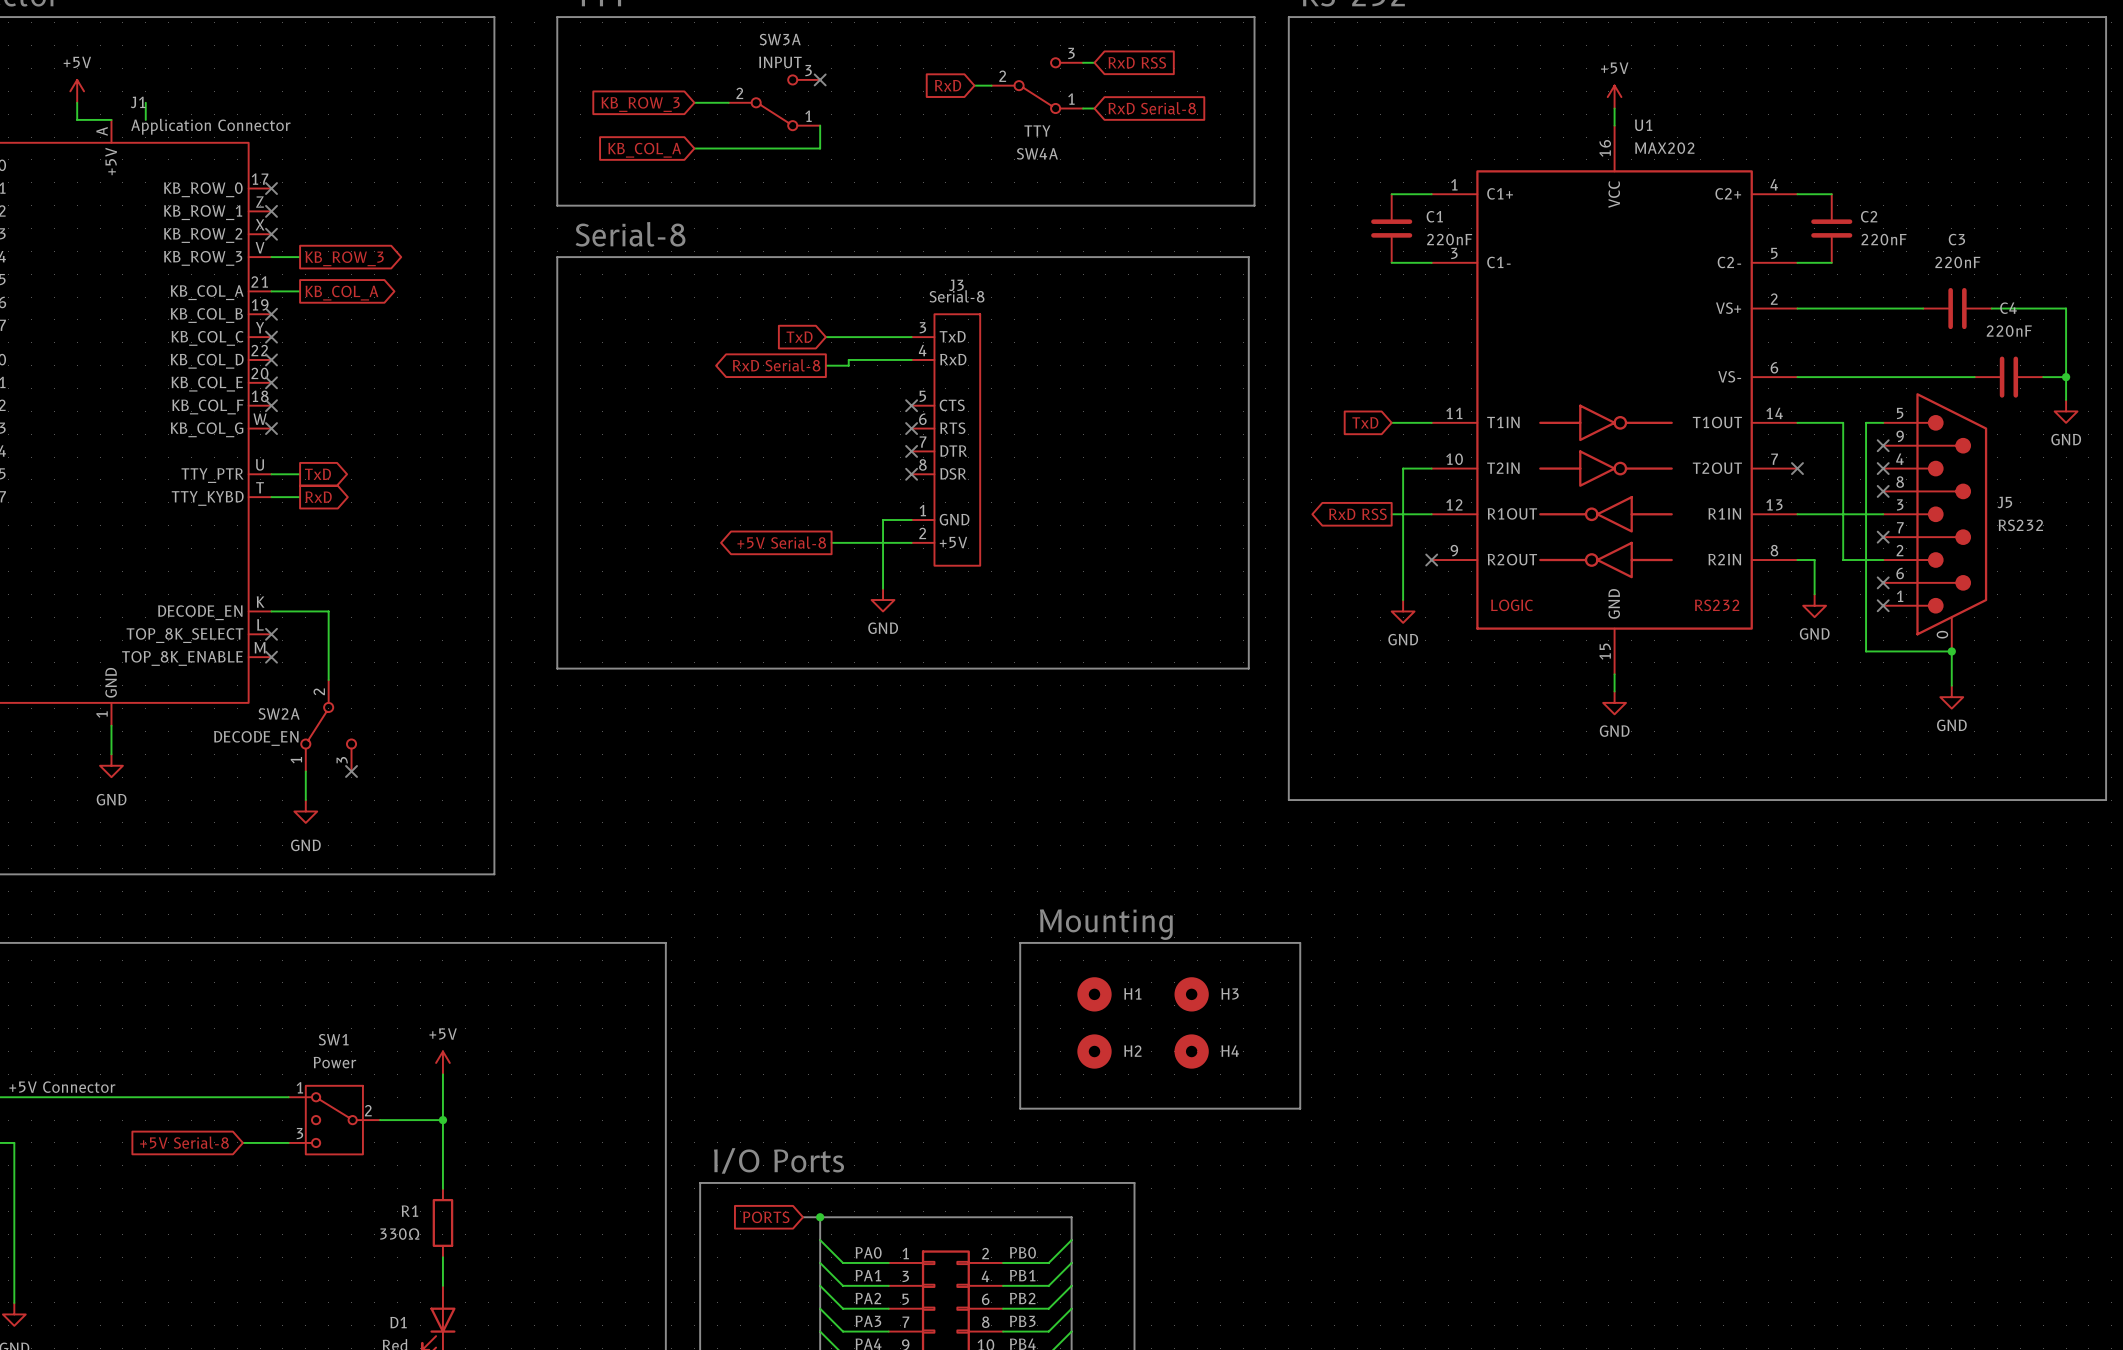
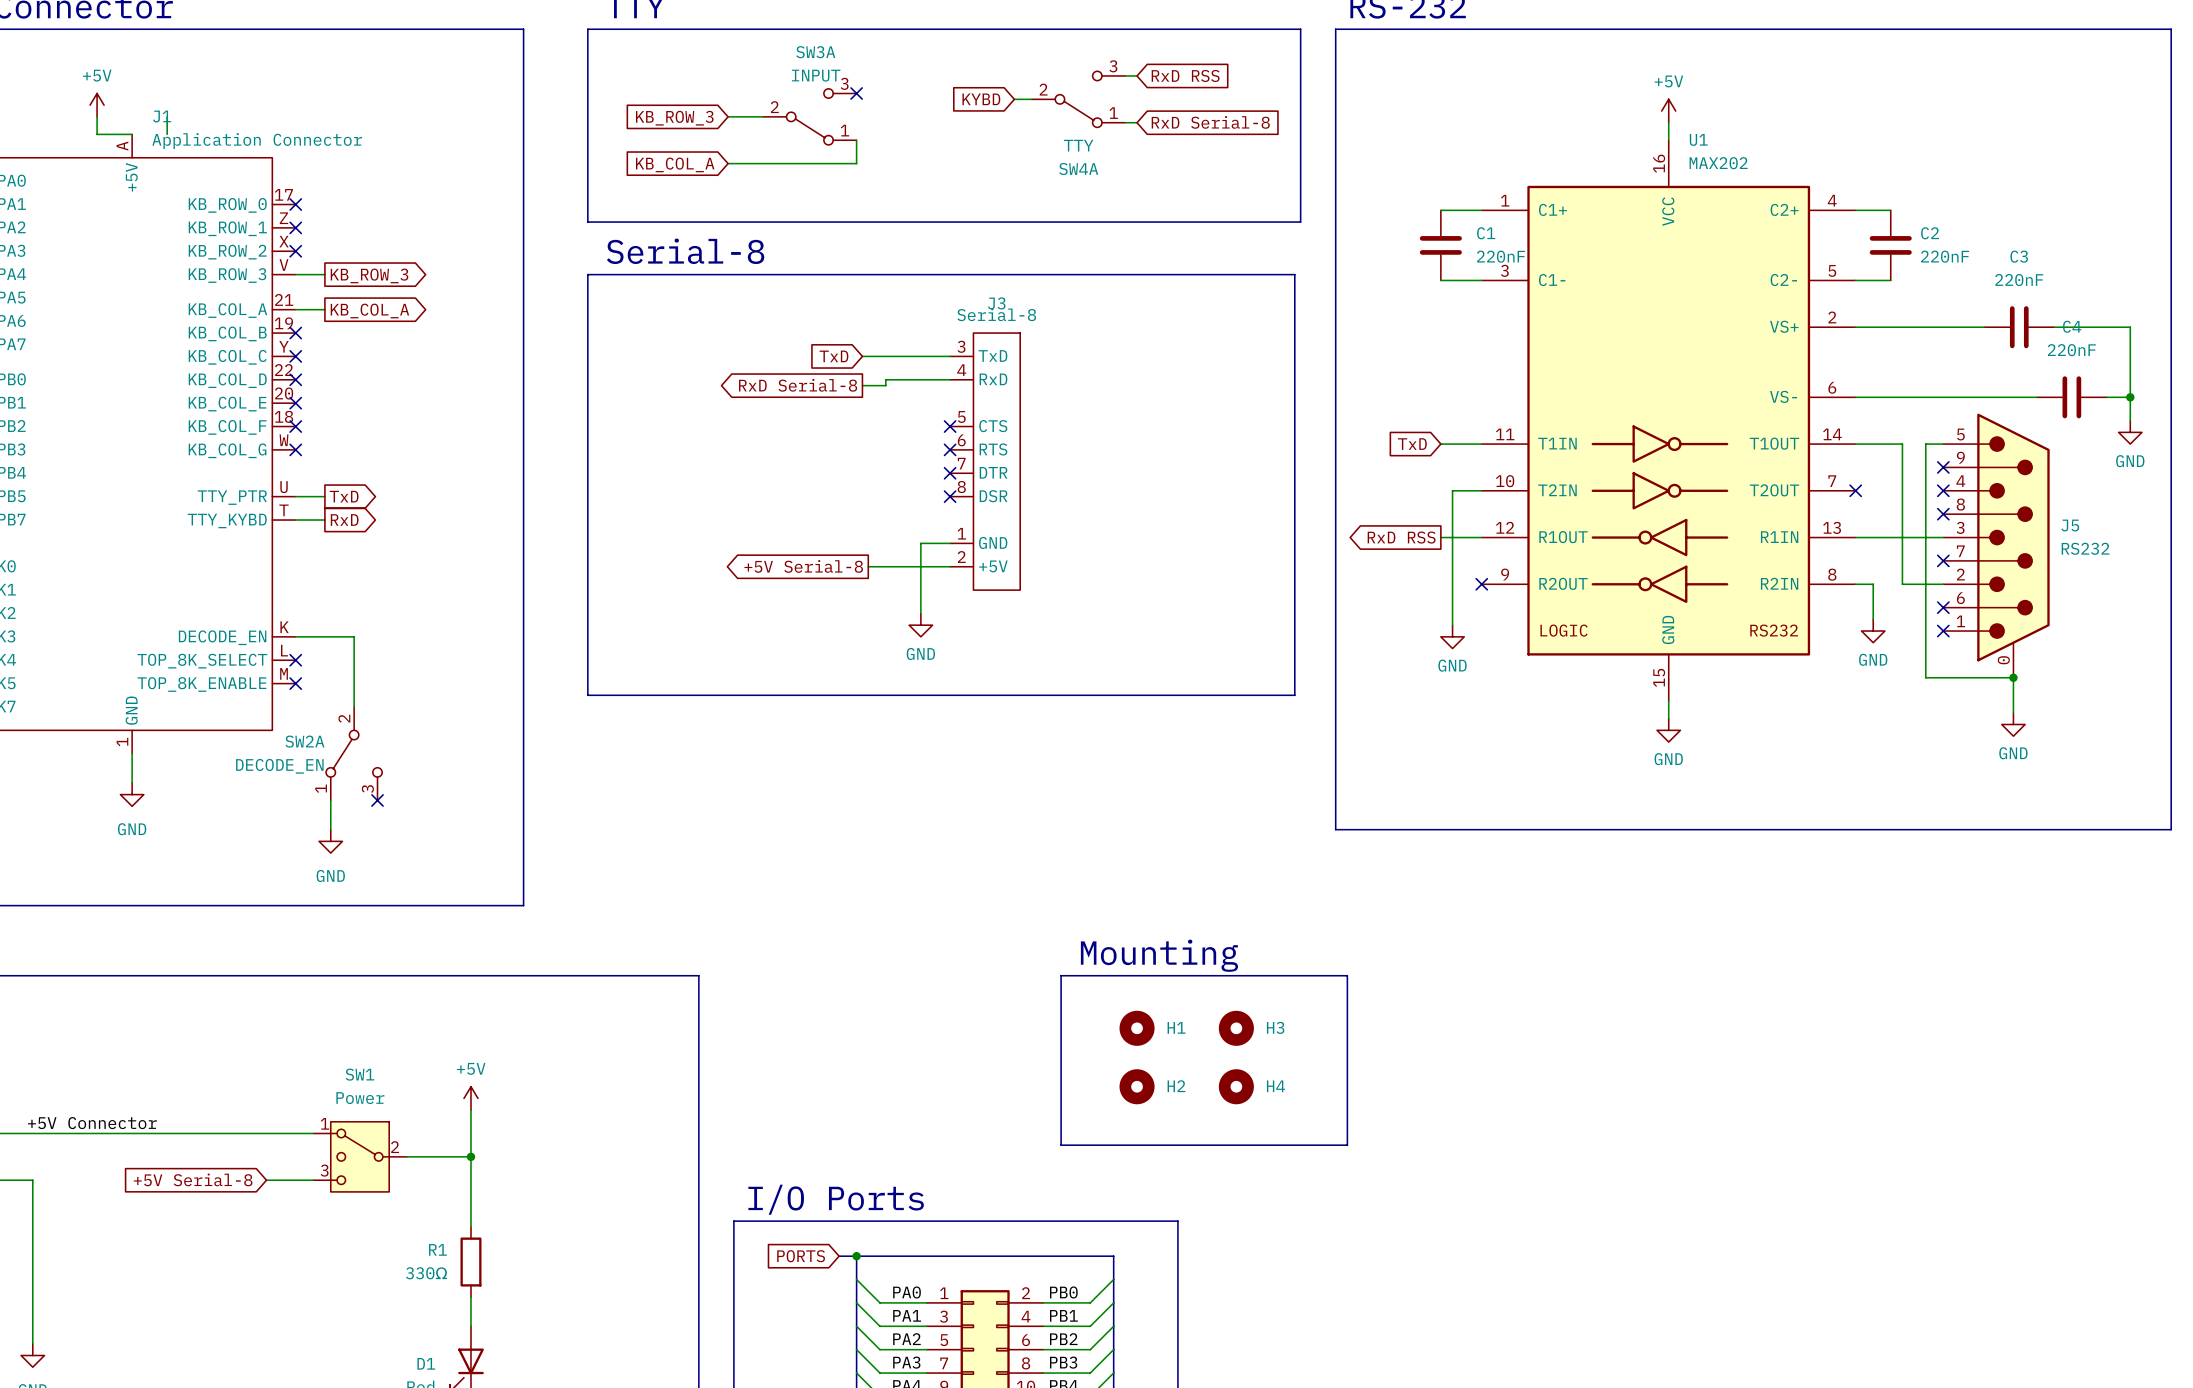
global label: RxD (948, 85) -> KYBD (981, 99)

